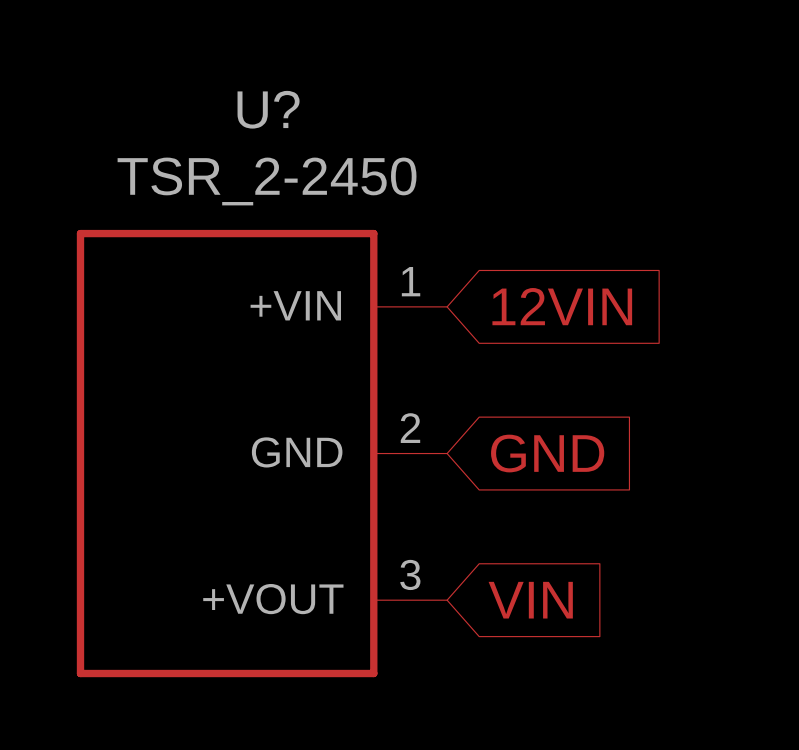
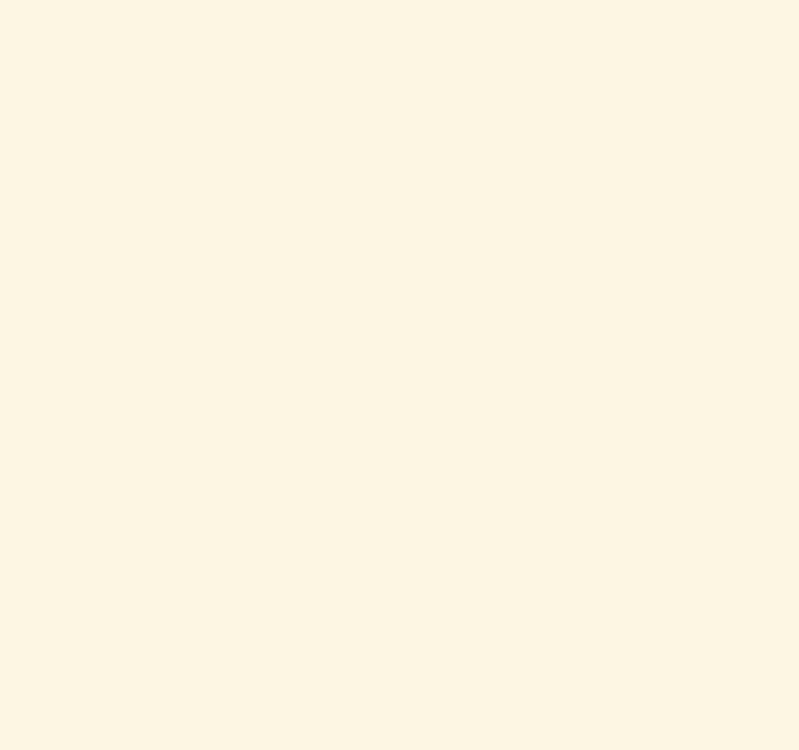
global label: 12VIN (562, 306) -> none
U?: TSR_2-2450 (261, 453) -> none
global label: GND (547, 453) -> none
global label: VIN (530, 600) -> none

